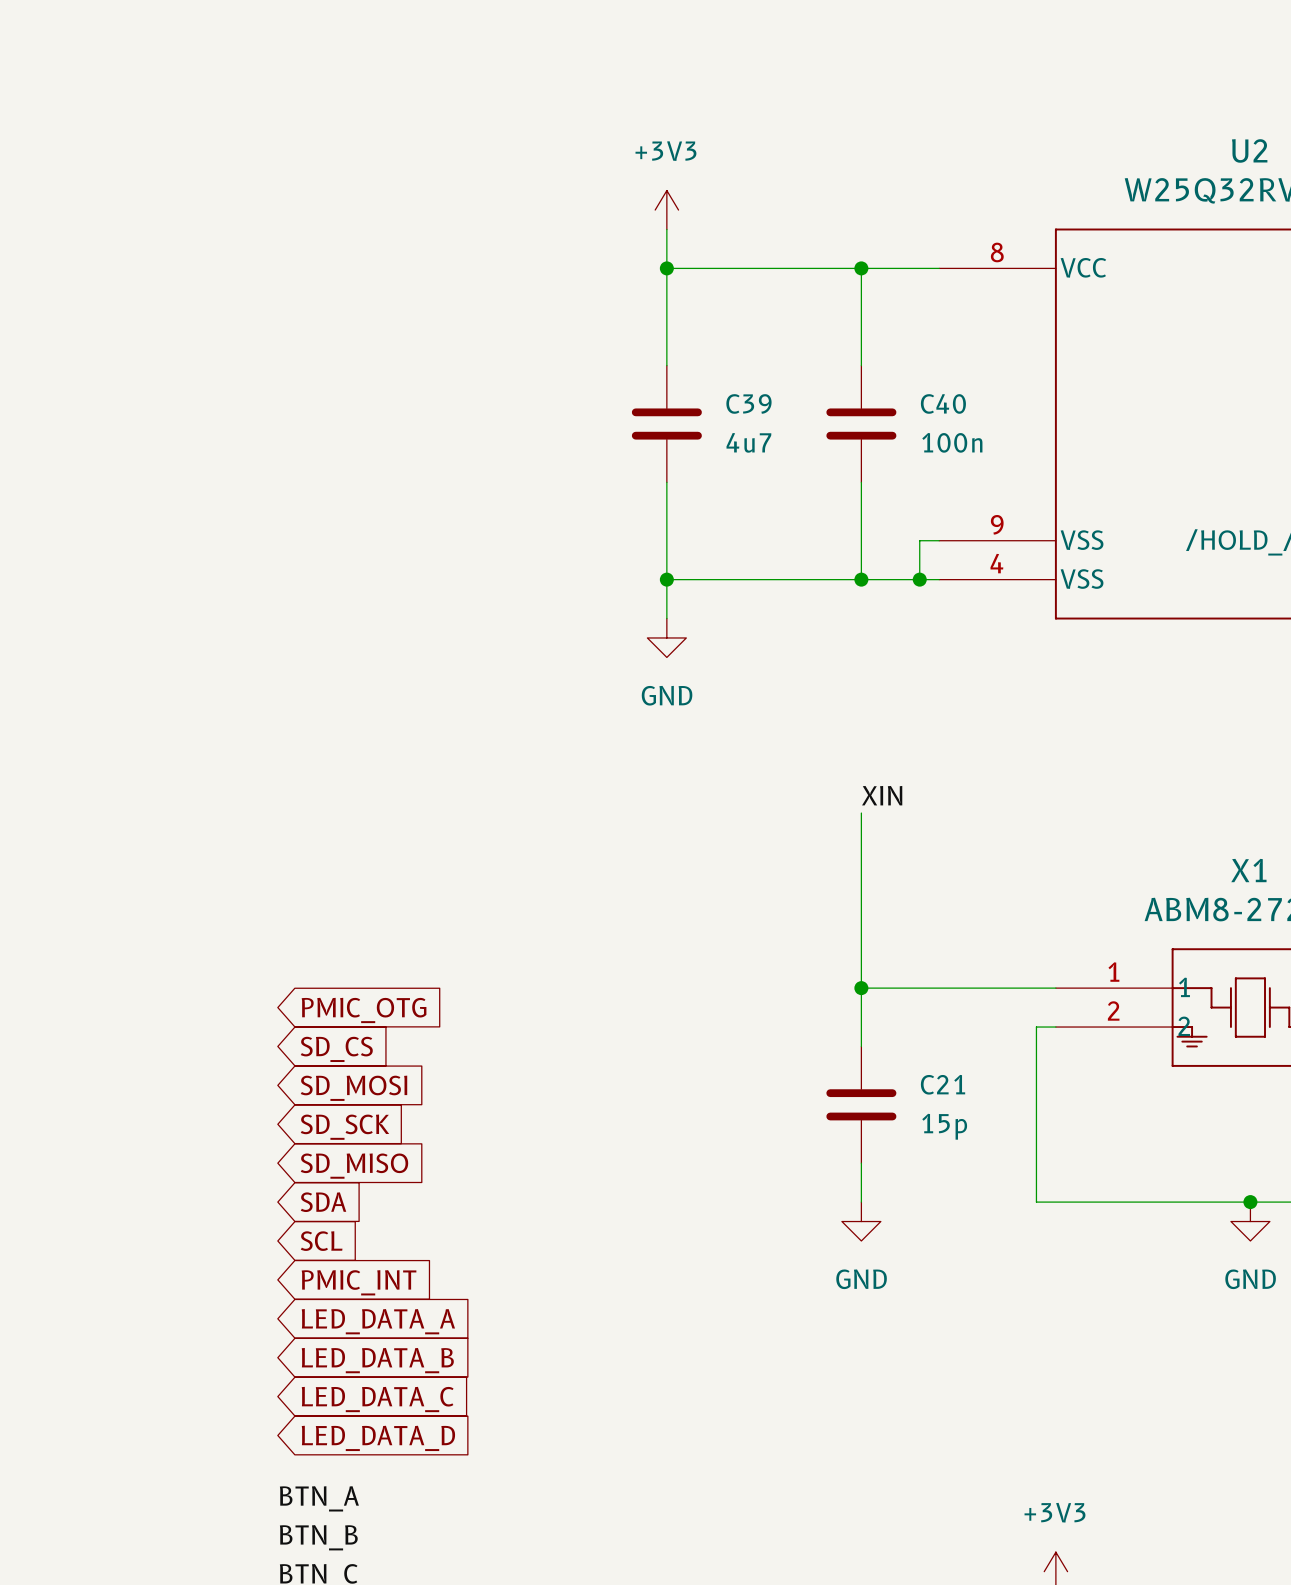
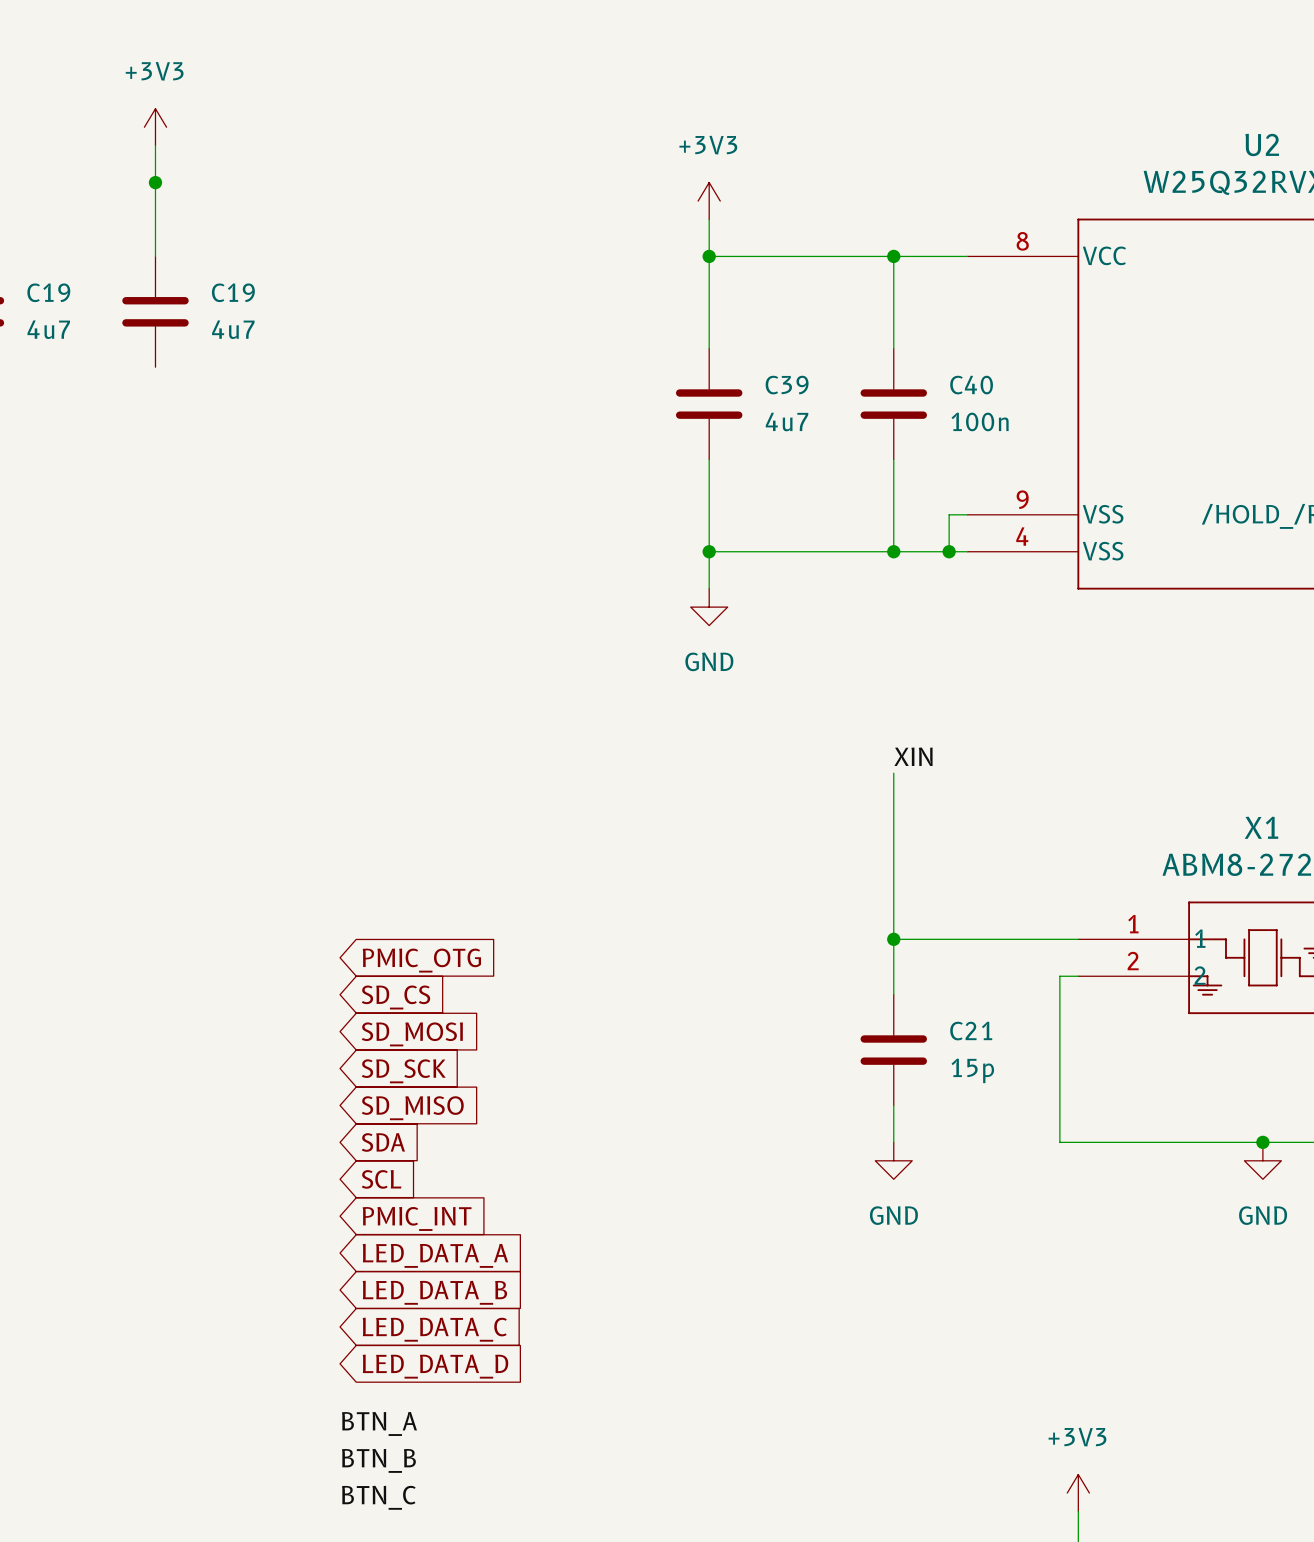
power symbol: none -> +3V3 (155, 127)
wire: none -> (155, 145) (155, 256)
junction: none -> (155, 182)
C19: none -> 4u7 (155, 311)

